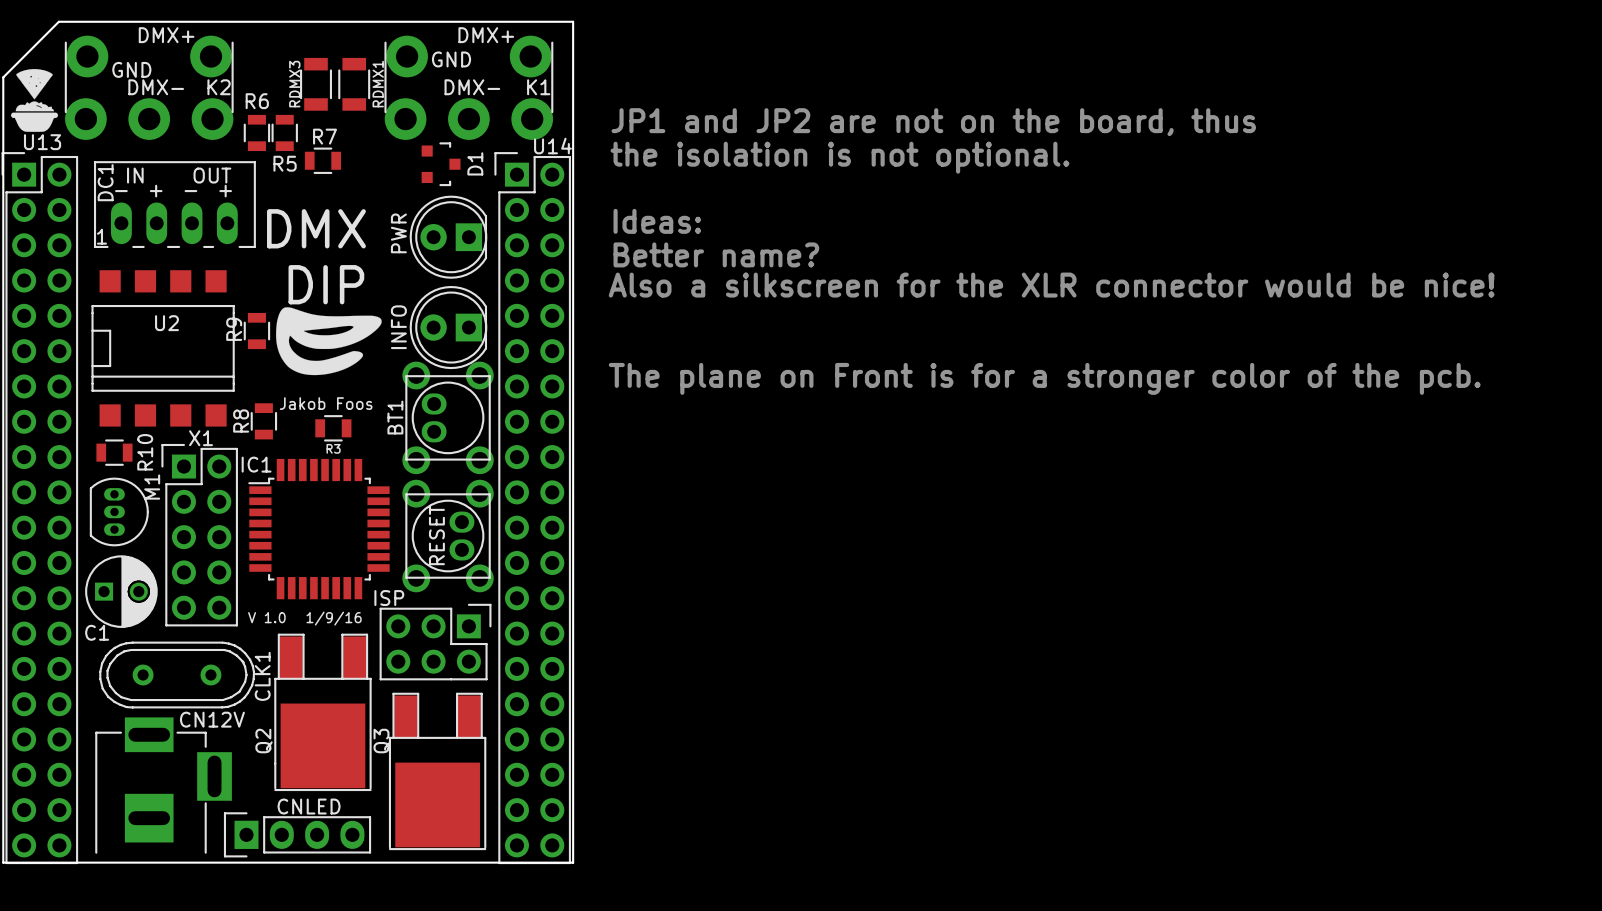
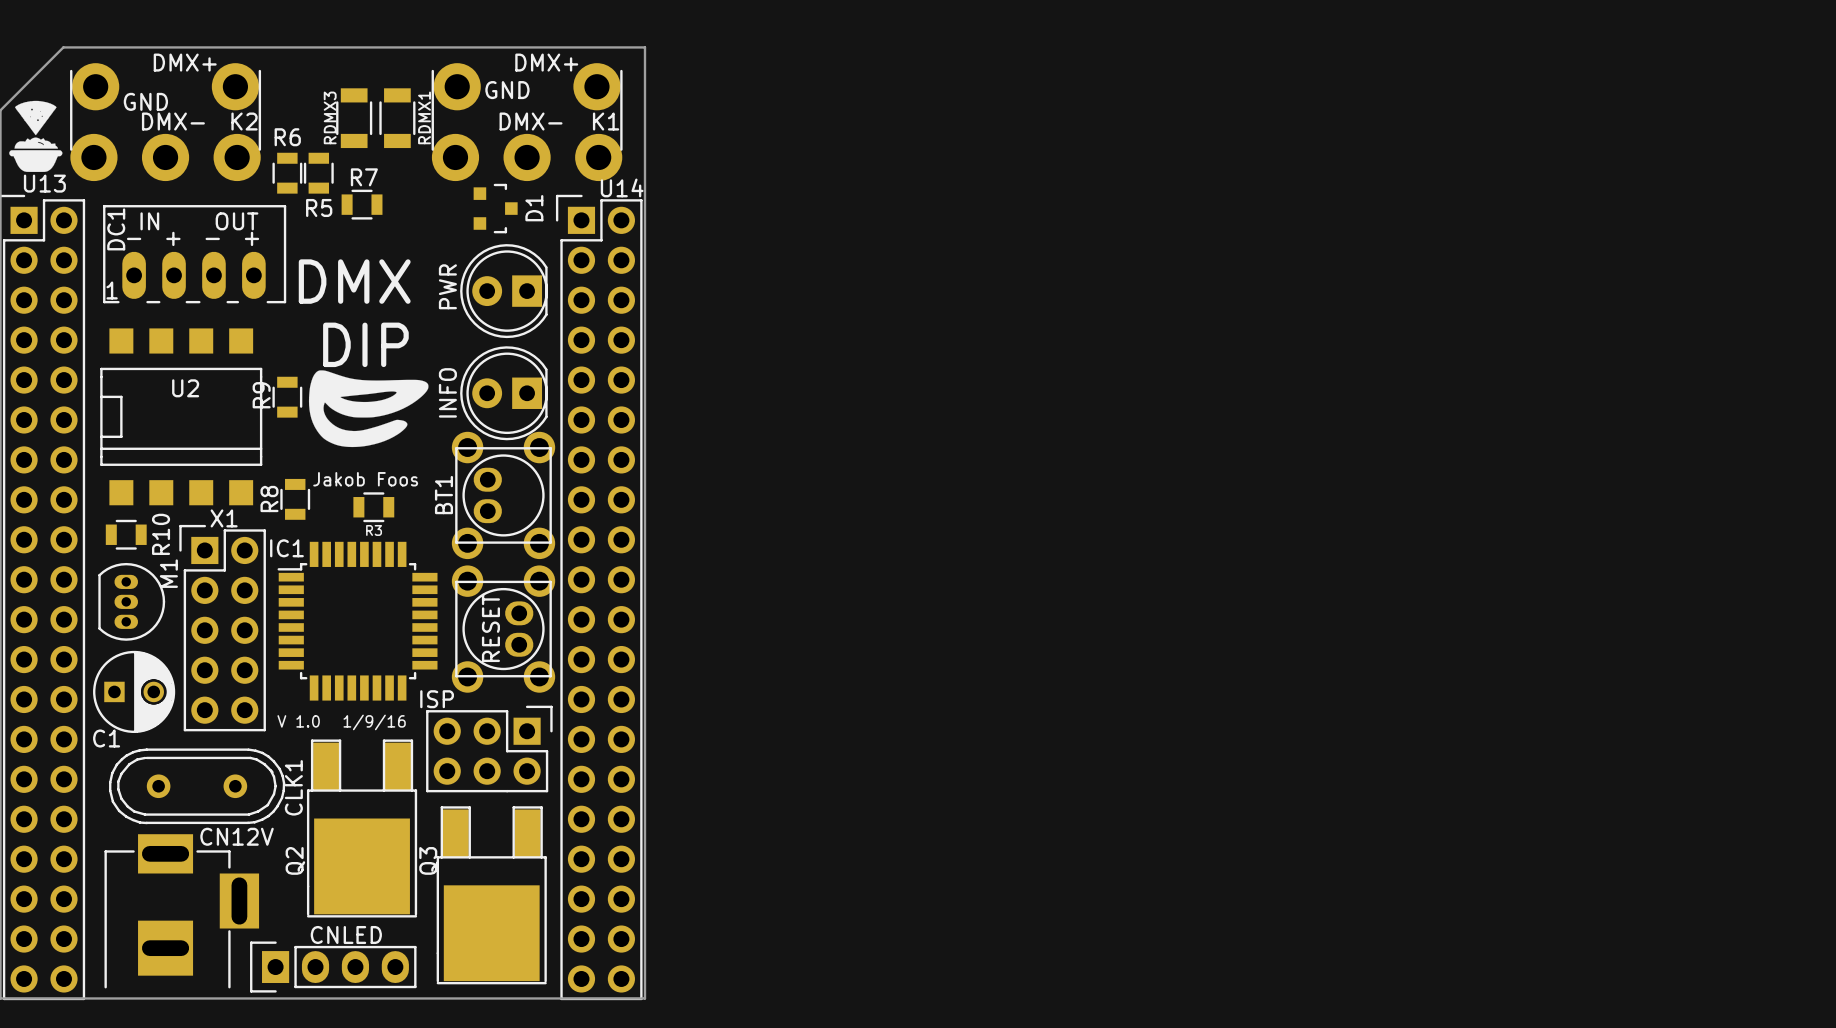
text: JP1 and JP2 are not on the board, thus (933, 122) -> none
text: the isolation is not optional. (839, 157) -> none
text: Ideas: (657, 221) -> none
text: Better name? (716, 254) -> none
text: Also a silkscreen for the XLR connector would be nice! (1051, 285) -> none
text: The plane on Front is for a stronger color of the pcb. (1044, 378) -> none

